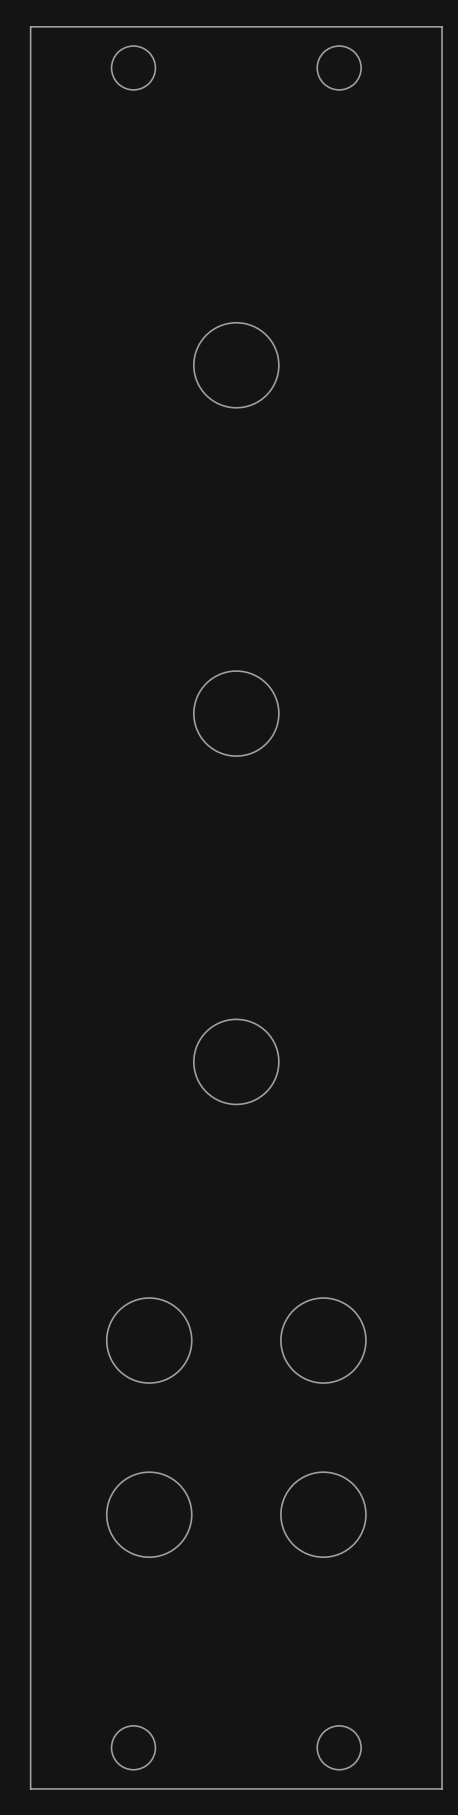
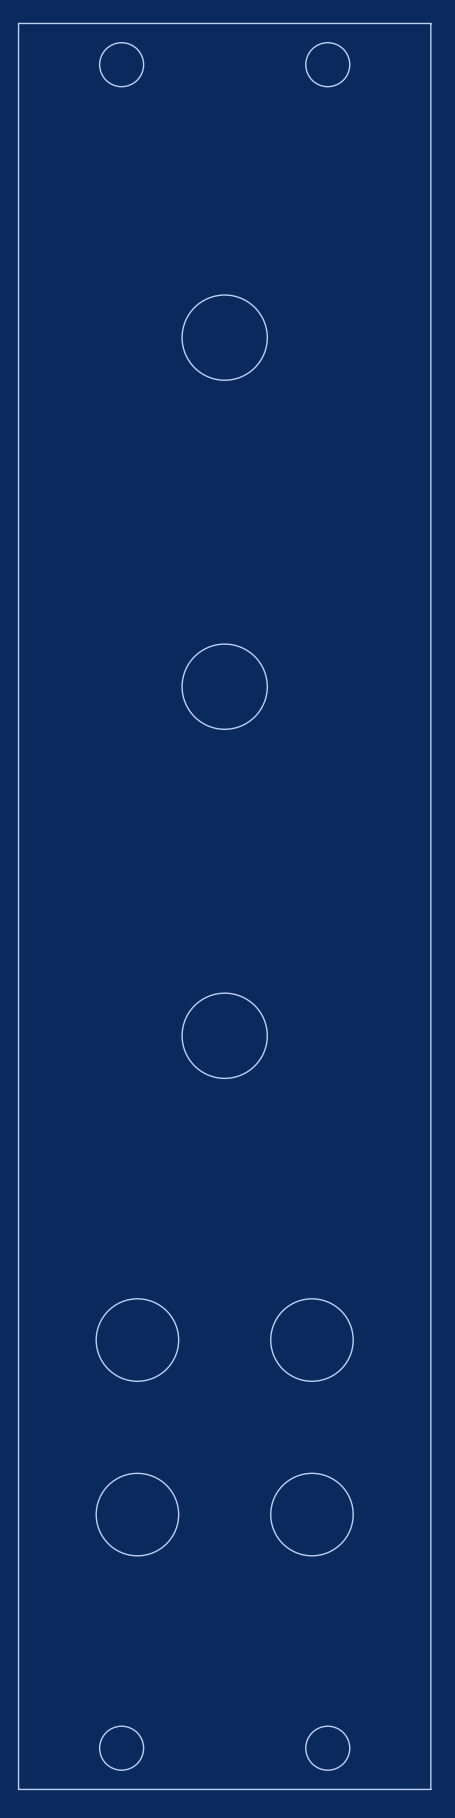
round board edge: none -> [181, 294, 268, 381]
drawing: [193, 322, 280, 409] -> none
round board edge: none -> [181, 643, 268, 730]
drawing: [193, 670, 280, 757] -> none
round board edge: none -> [181, 992, 268, 1080]
drawing: [193, 1019, 280, 1105] -> none
drawing: [106, 1297, 193, 1384] -> none
drawing: [280, 1297, 367, 1384] -> none
round board edge: none -> [95, 1298, 180, 1382]
round board edge: none -> [270, 1298, 354, 1382]
drawing: [106, 1471, 193, 1558] -> none
drawing: [280, 1471, 367, 1558] -> none
round board edge: none -> [95, 1472, 180, 1557]
round board edge: none -> [270, 1472, 354, 1557]

